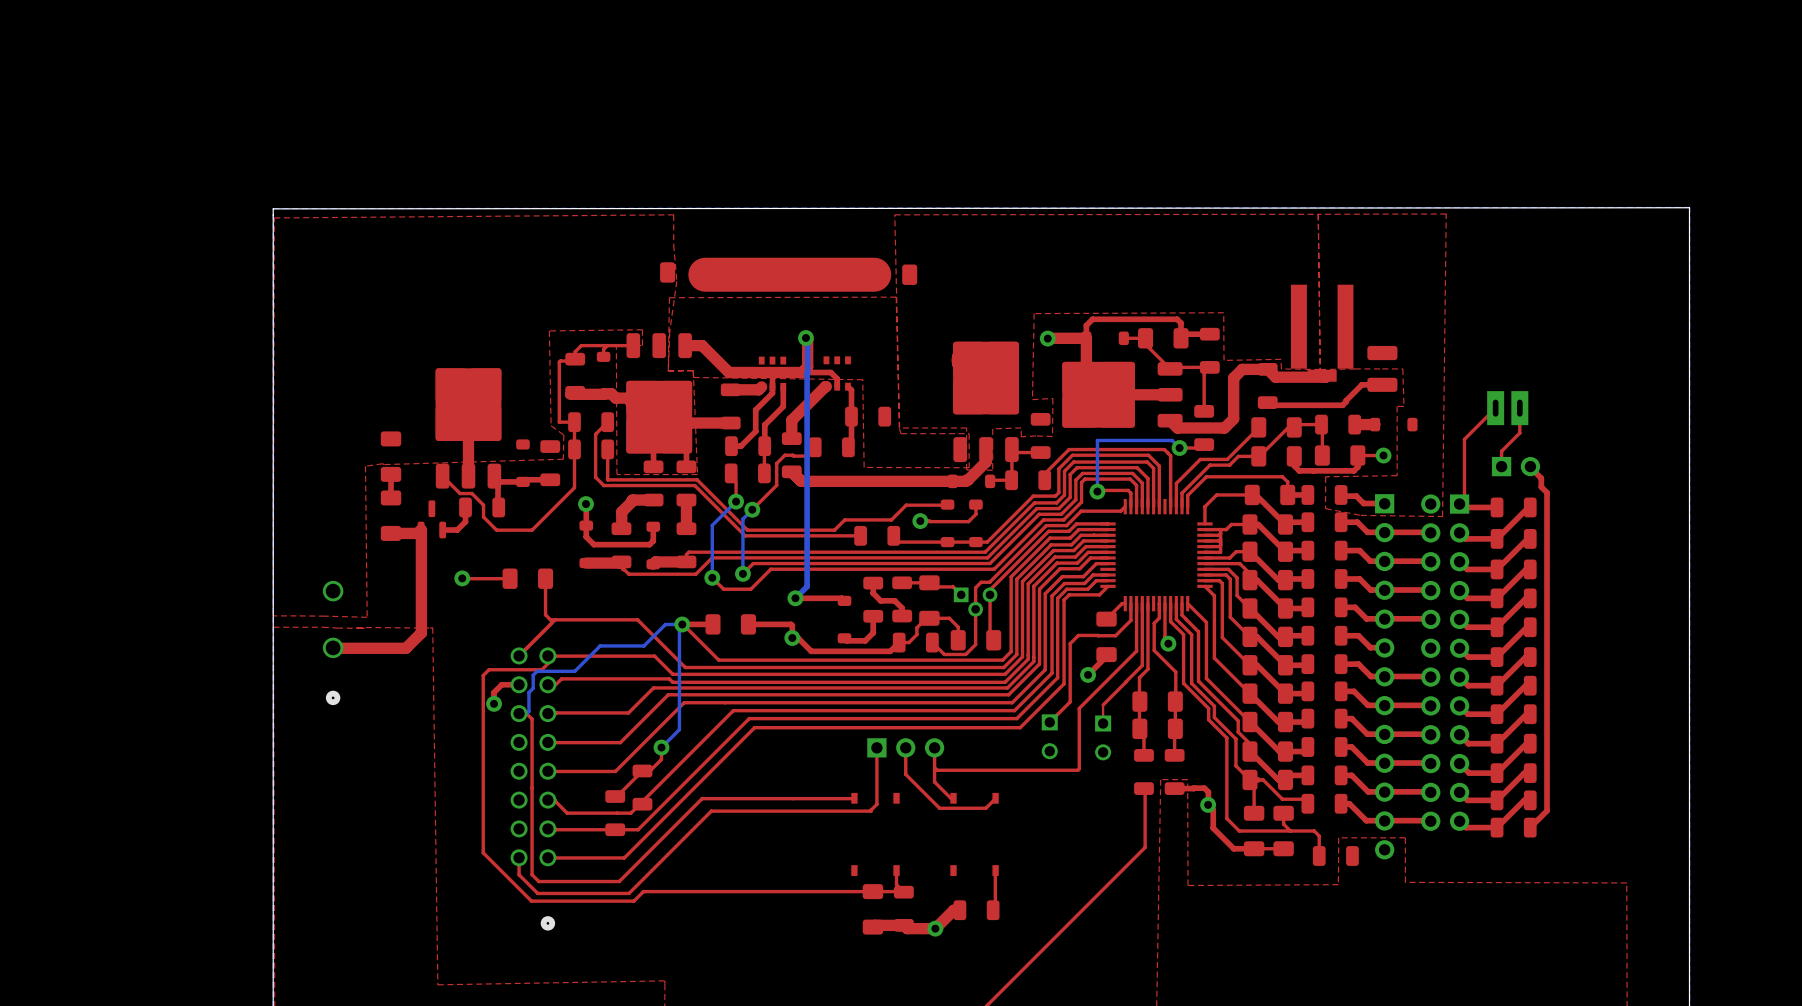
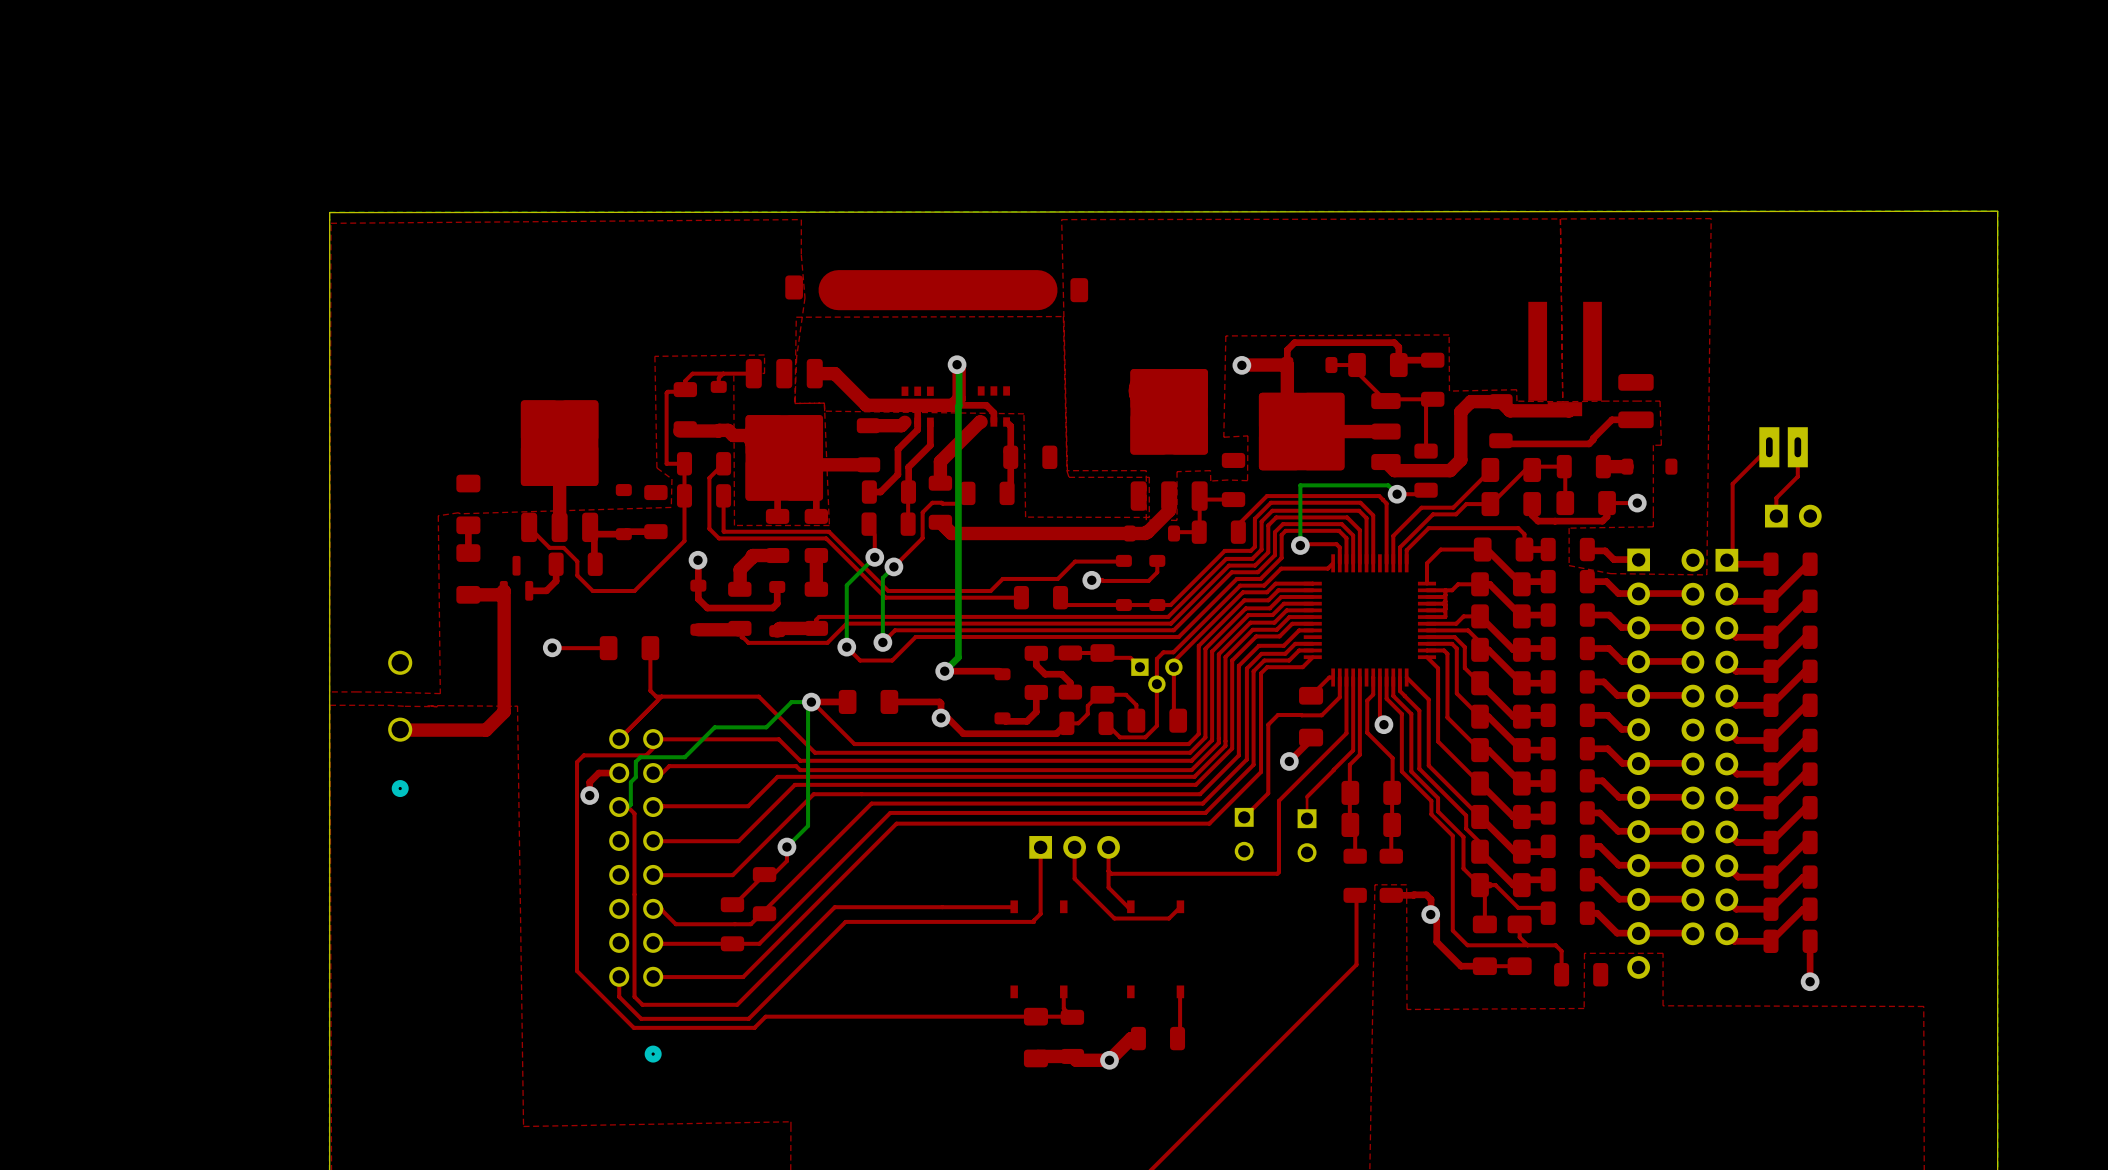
top track: (1529, 466) (1541, 478) (1541, 487) (1547, 492) (1547, 810) (1530, 827) -> (1810, 981) (1810, 941)
via: none -> (1810, 981)

